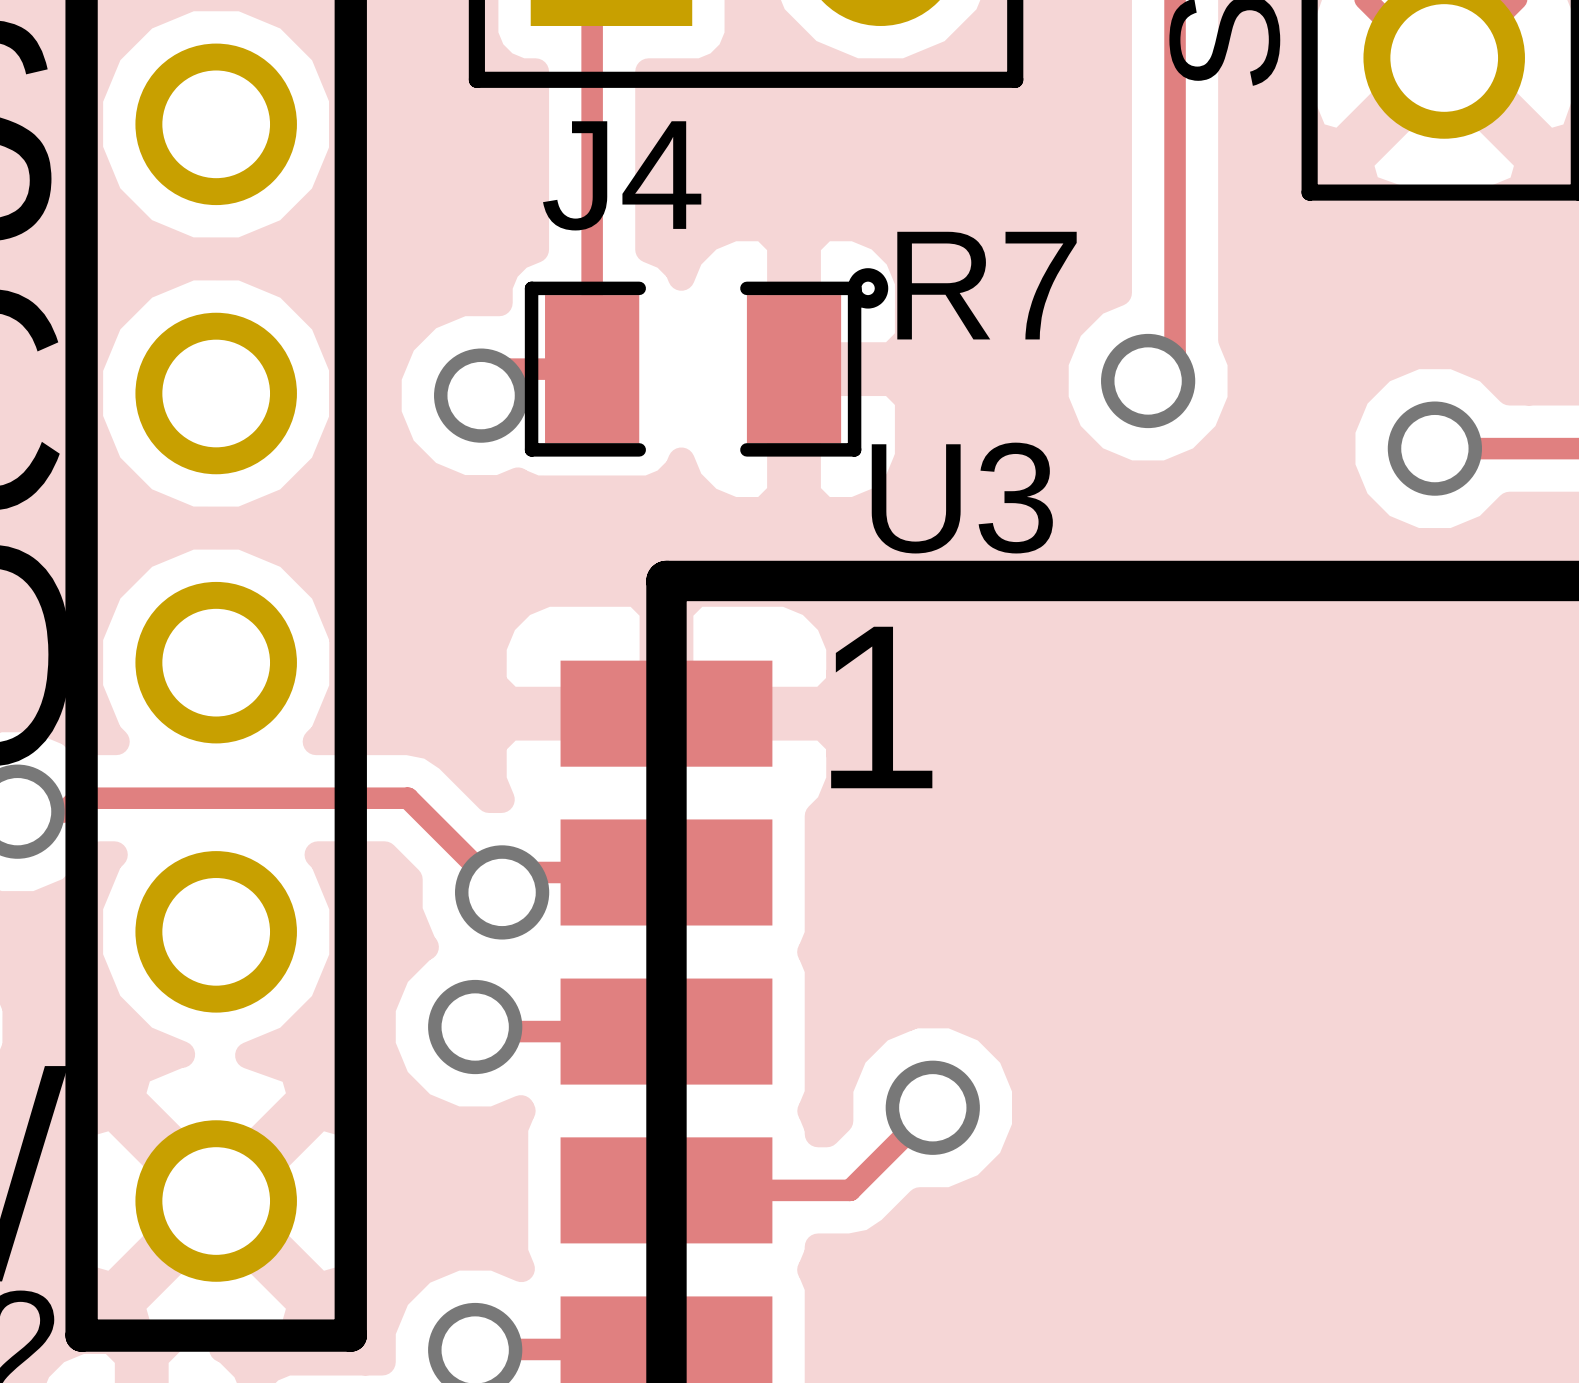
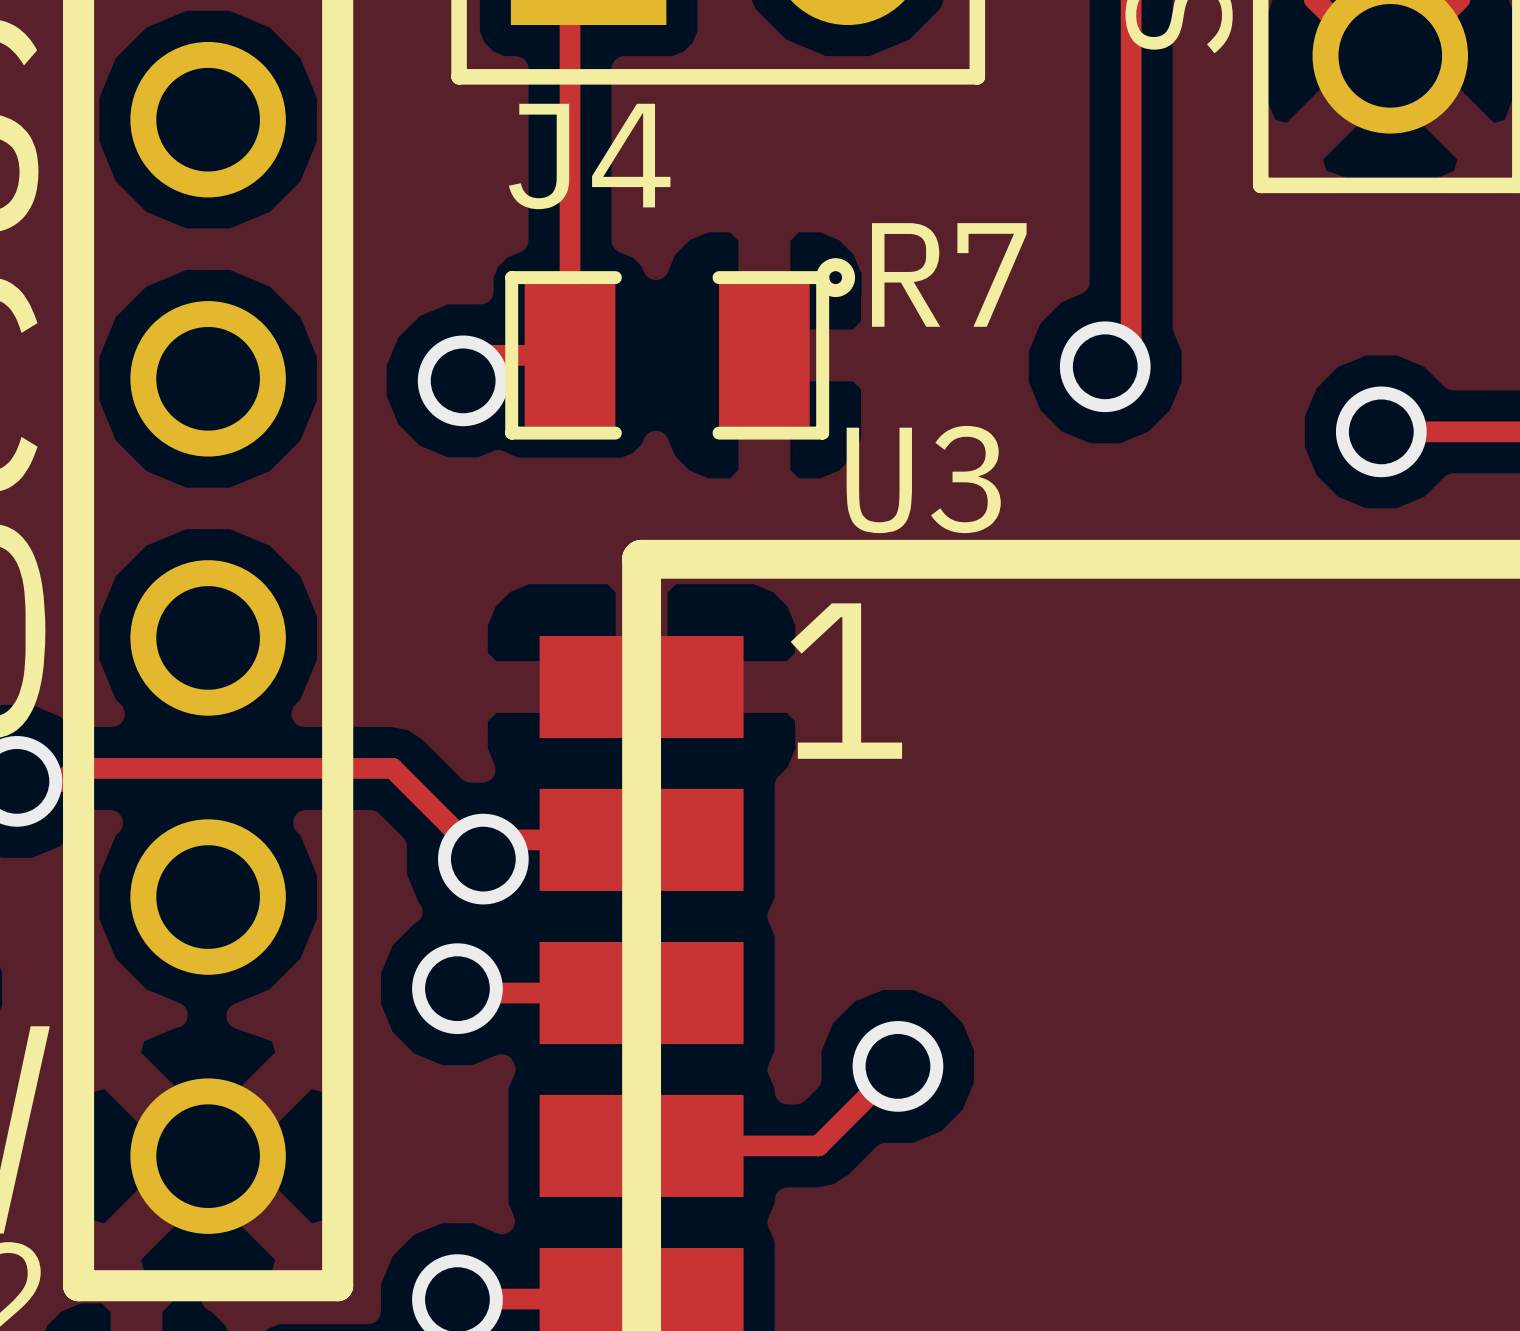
J4 name position: J4 (622, 175) -> J4 (589, 156)

